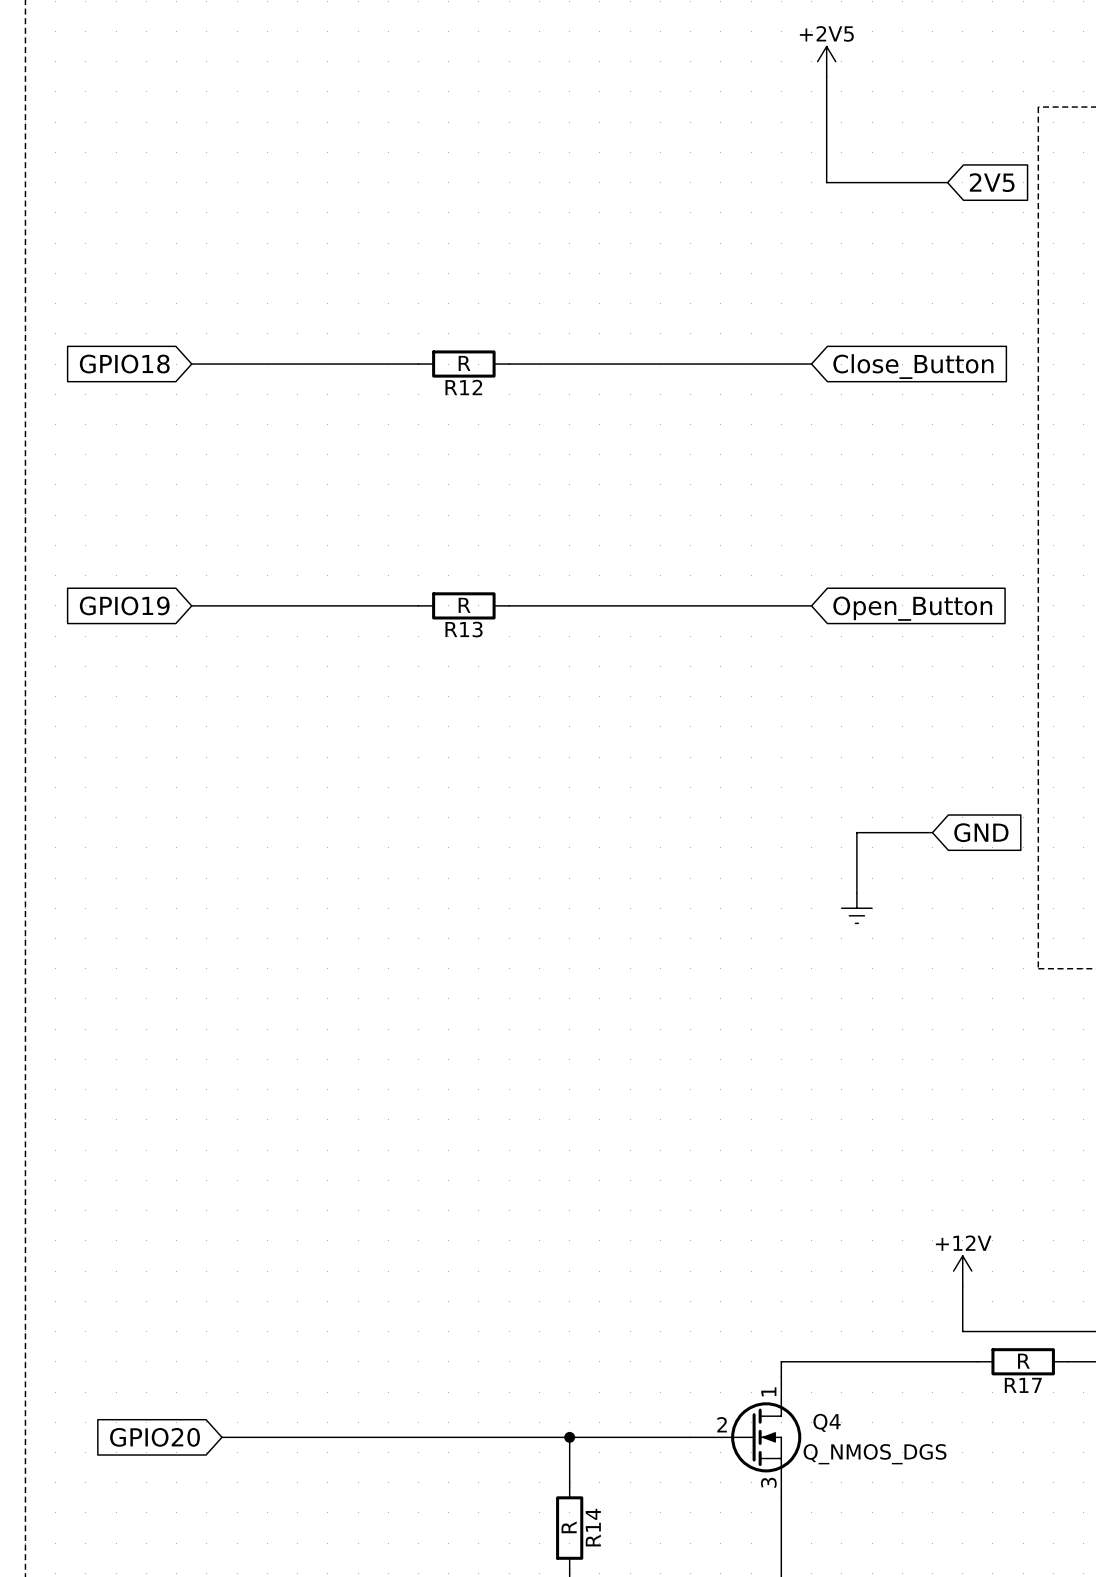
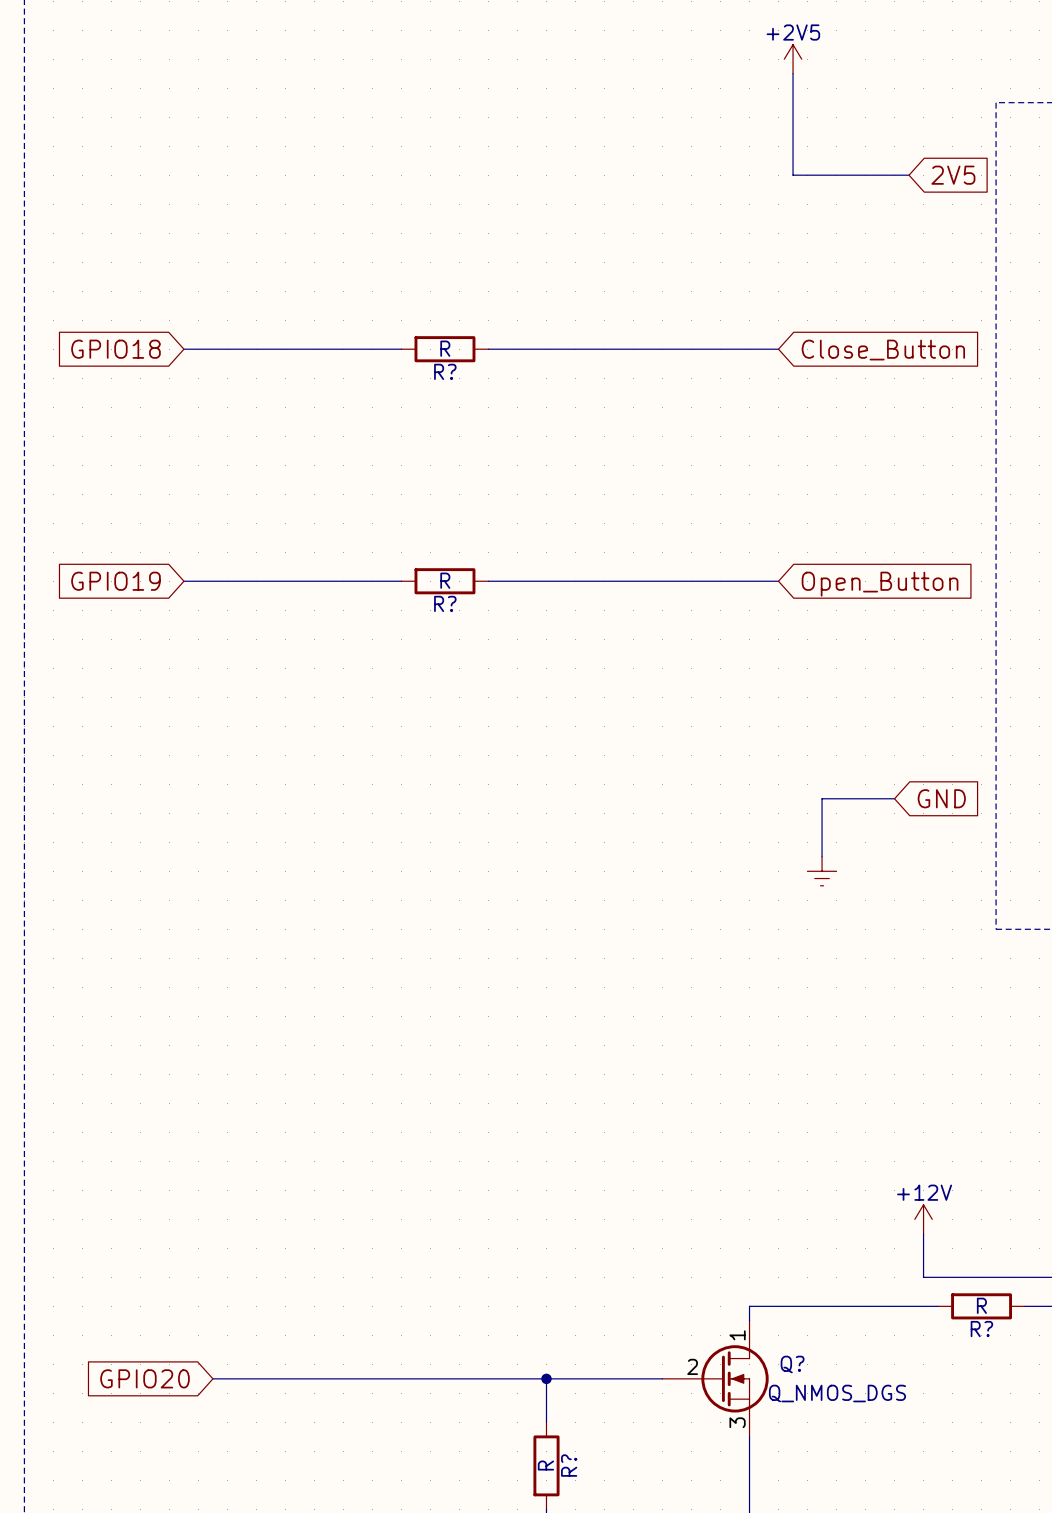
R12 name: R12 (463, 387) -> R? (445, 371)
R13 name: R13 (464, 629) -> R? (445, 603)
R17 name: R17 (1023, 1385) -> R? (981, 1329)
Q4 name: Q4 (827, 1422) -> Q? (792, 1364)
R14 name: R14 (593, 1527) -> R? (569, 1465)

